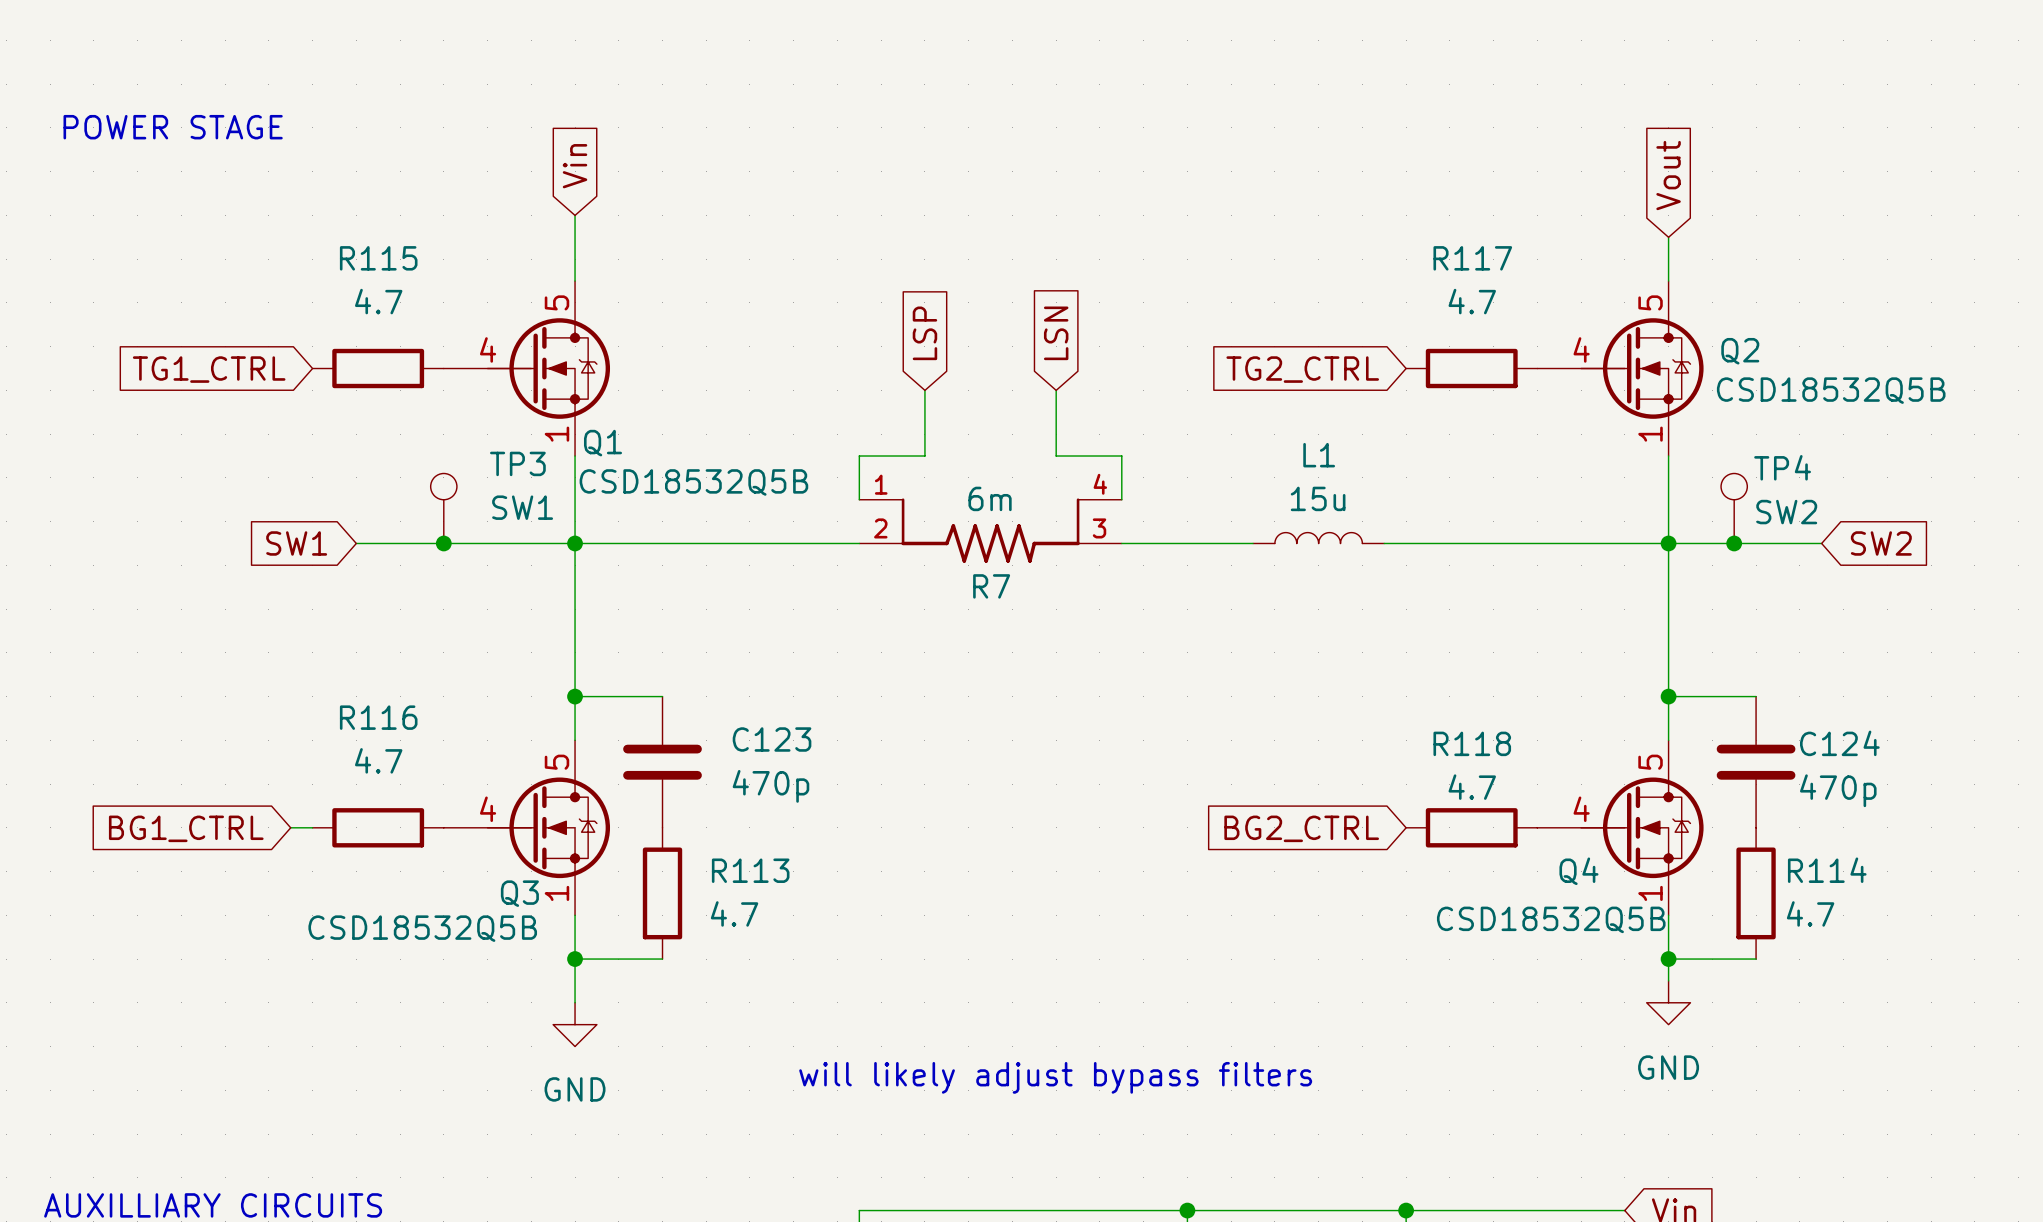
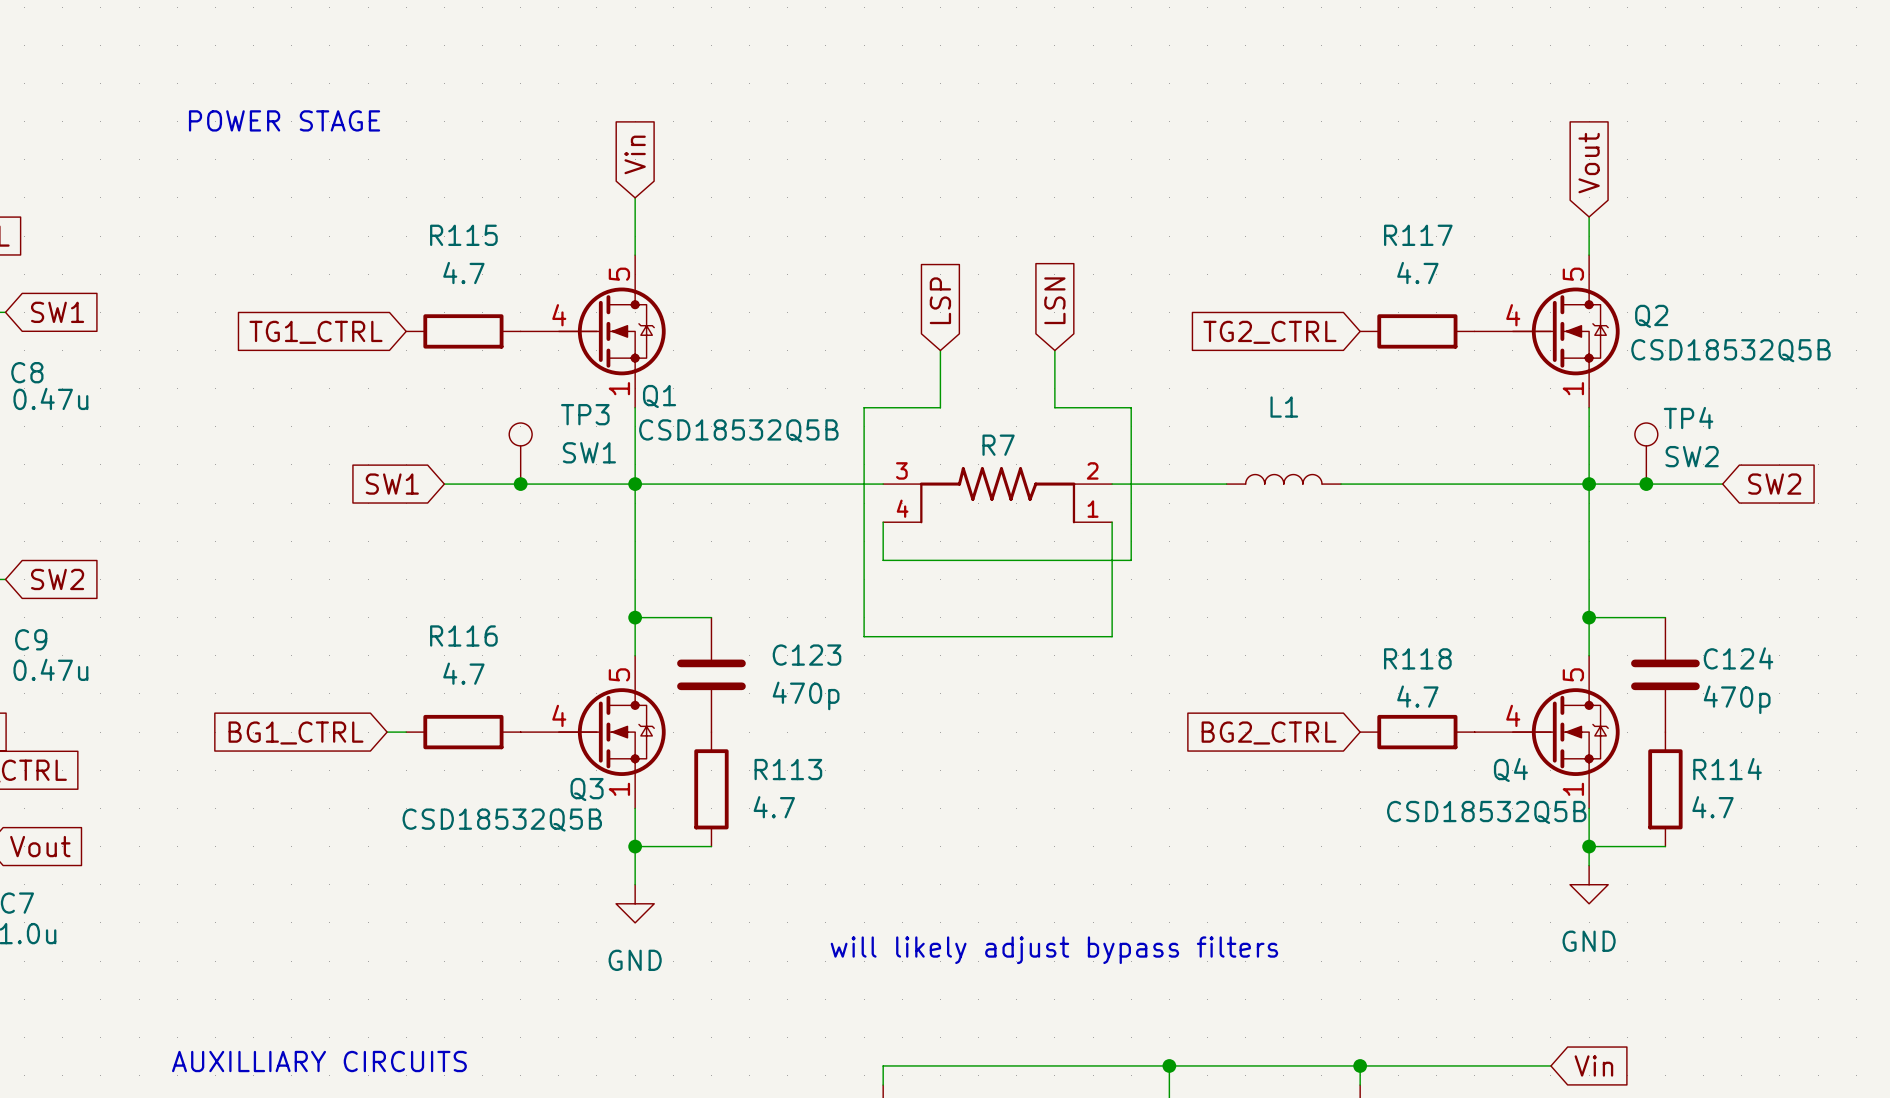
wire: (859, 456) (859, 499) -> (883, 407) (864, 407) (864, 636) (1112, 636) (1112, 522)
wire: (1121, 456) (1121, 499) -> (1112, 407) (1131, 407) (1131, 560) (883, 560) (883, 522)
R7 value: 6m (990, 498) -> none
L1 value: 15u (1318, 498) -> none
R7 rotation: 0° (990, 530) -> 180° (997, 495)

